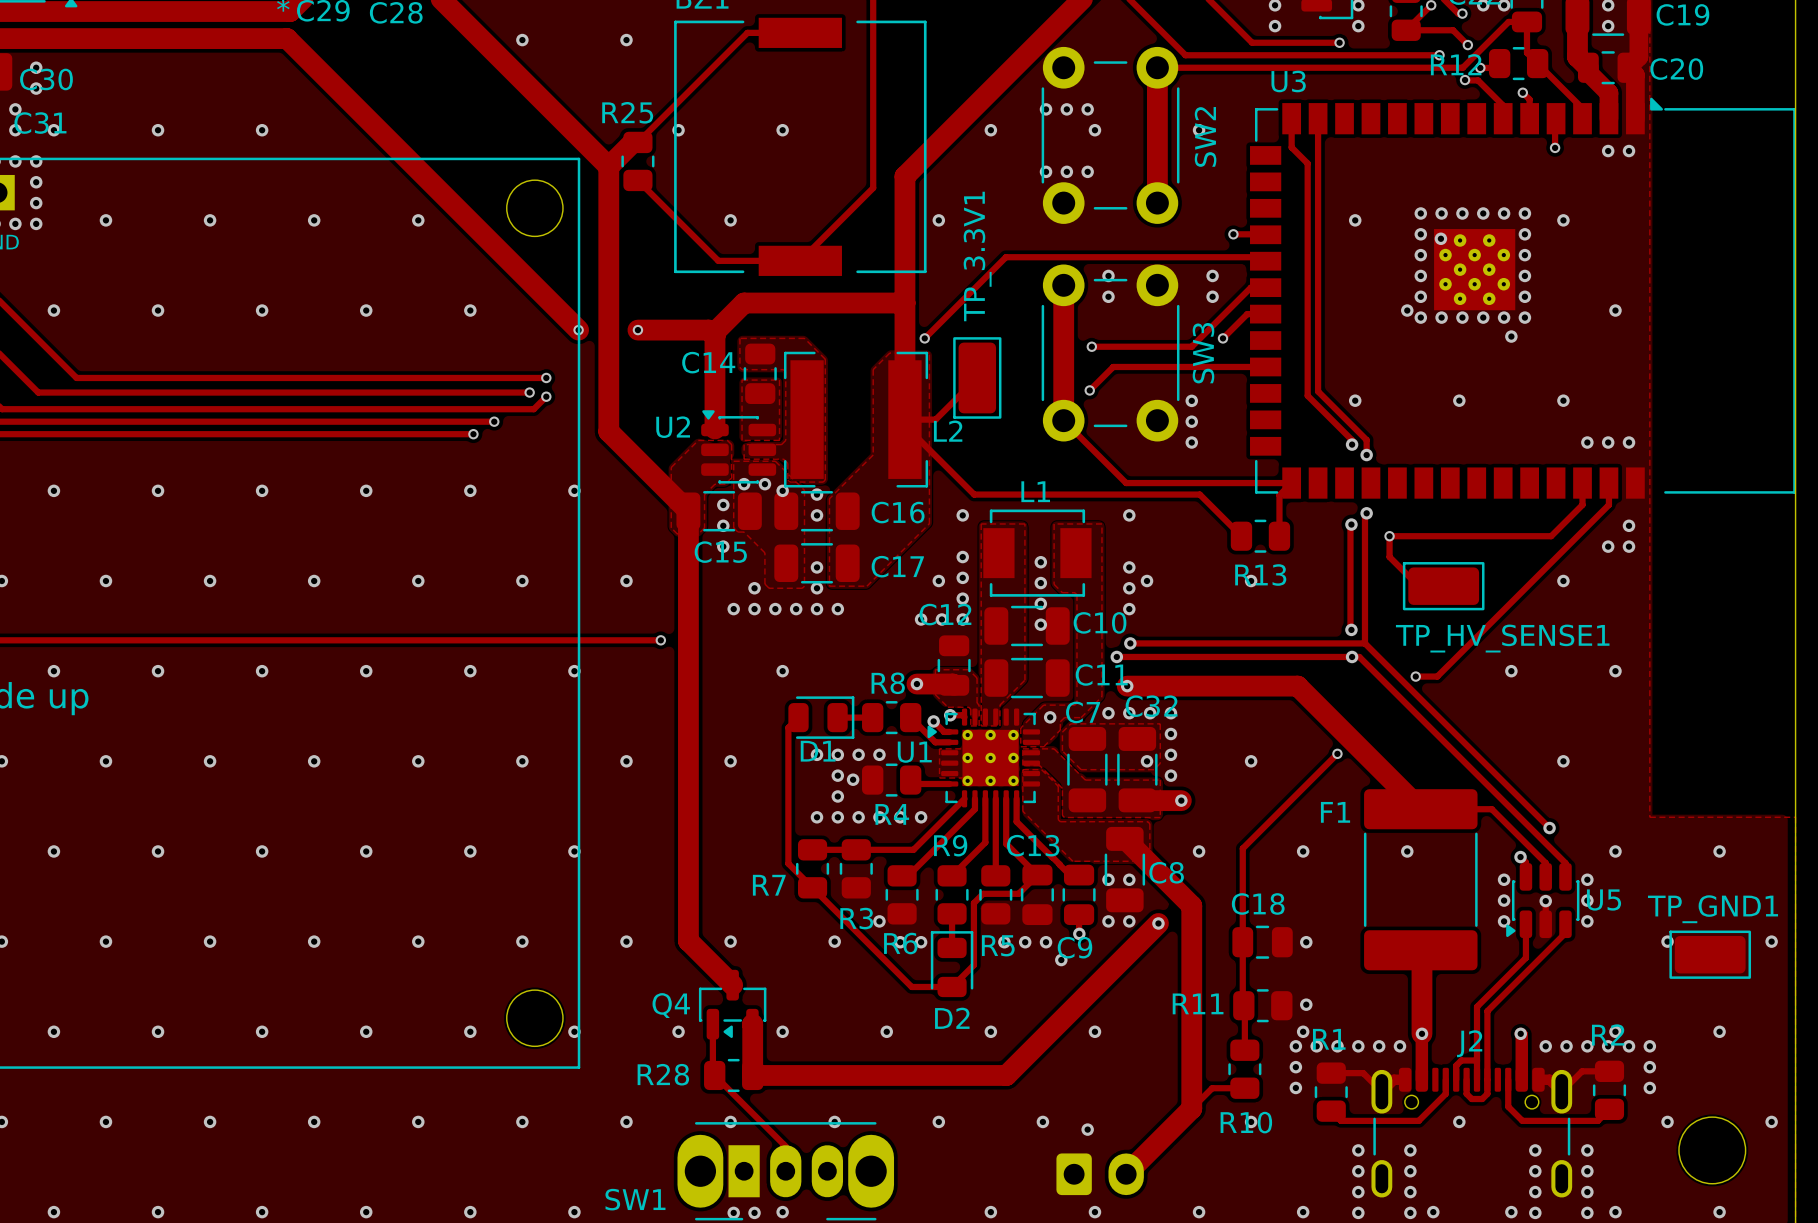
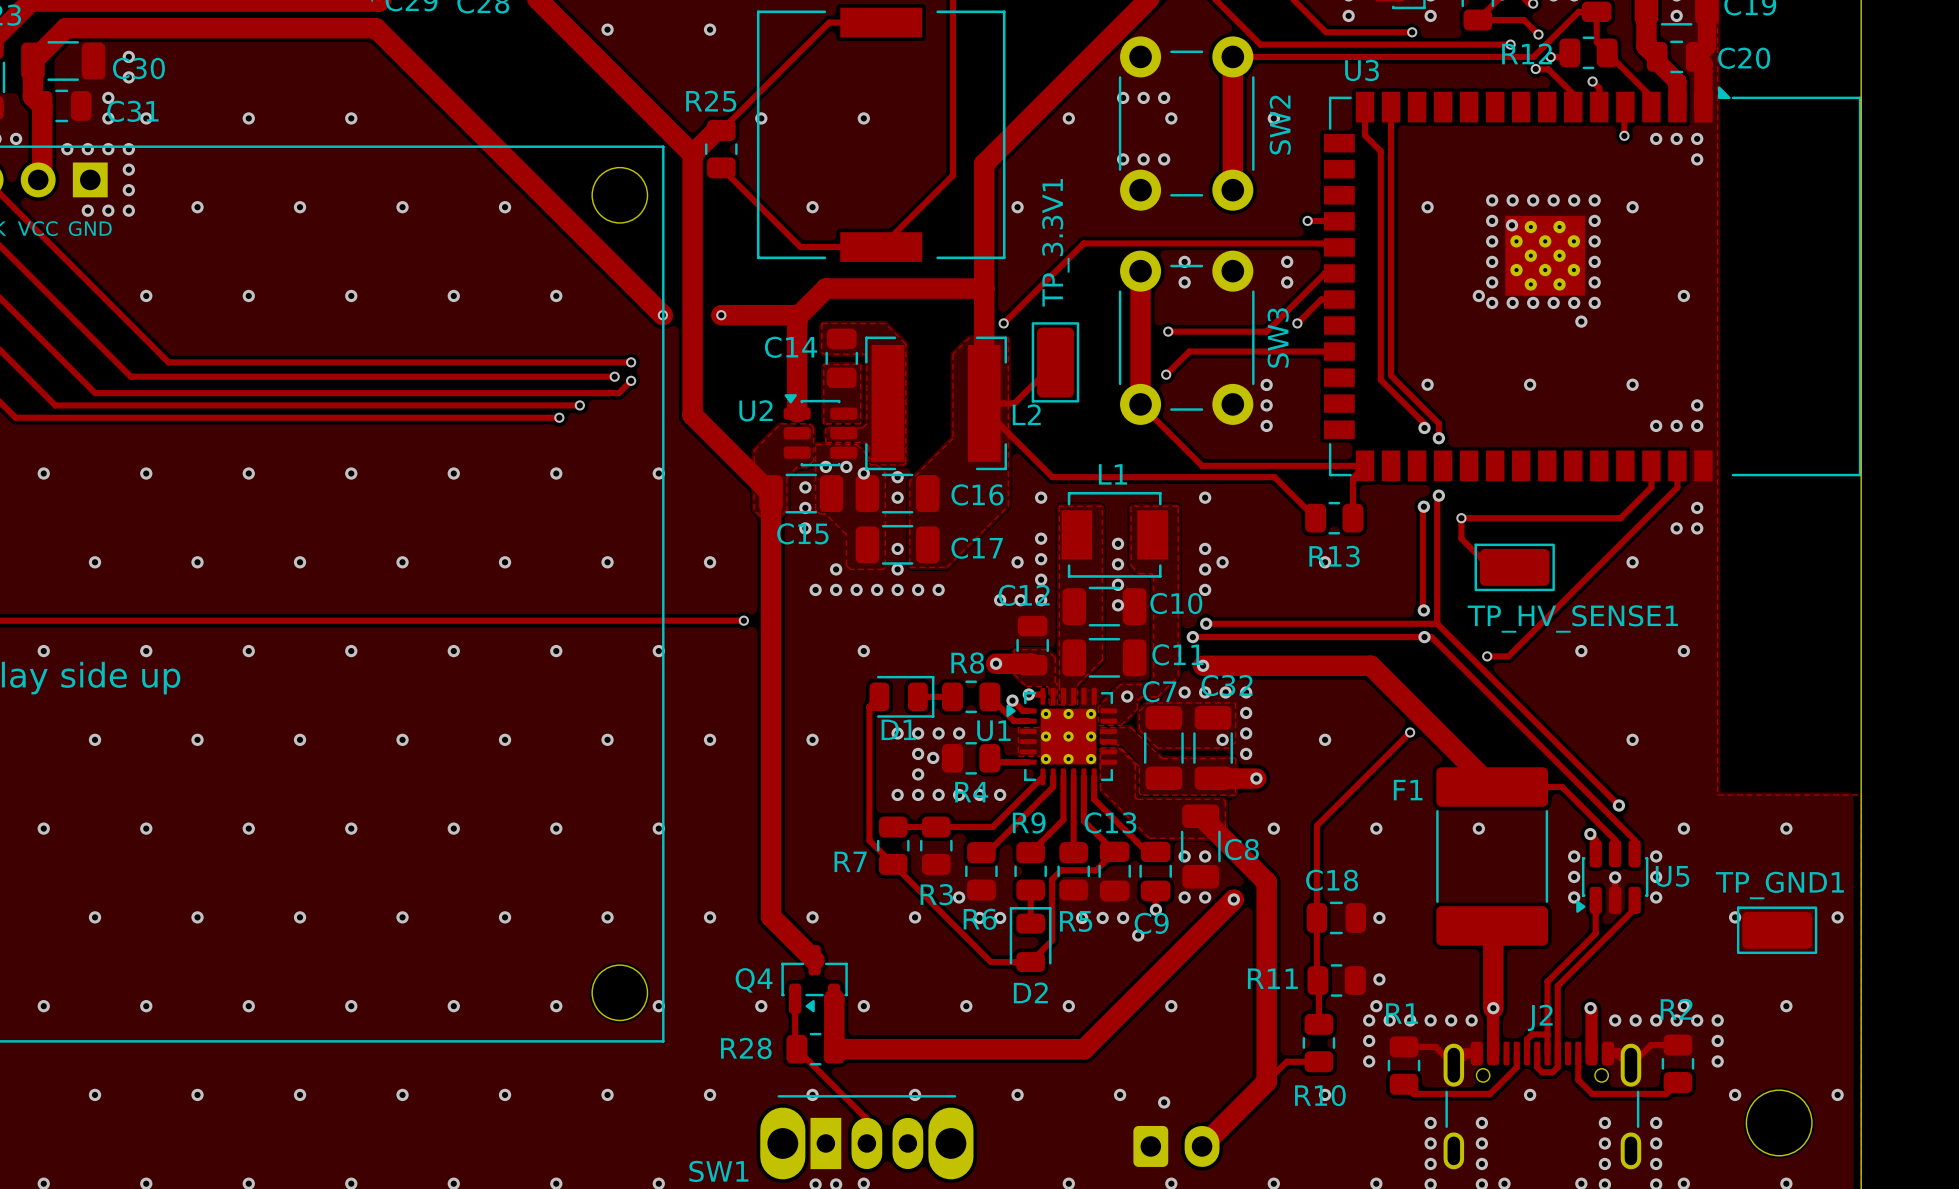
via: none -> (1656, 138)
via: none -> (1697, 159)
via: none -> (1697, 405)
via: none -> (938, 589)

